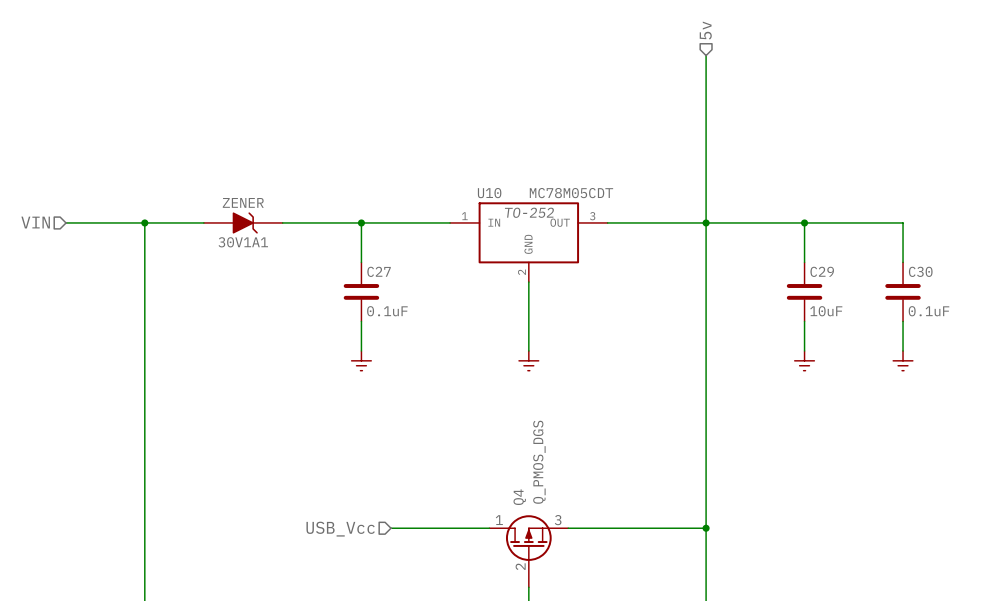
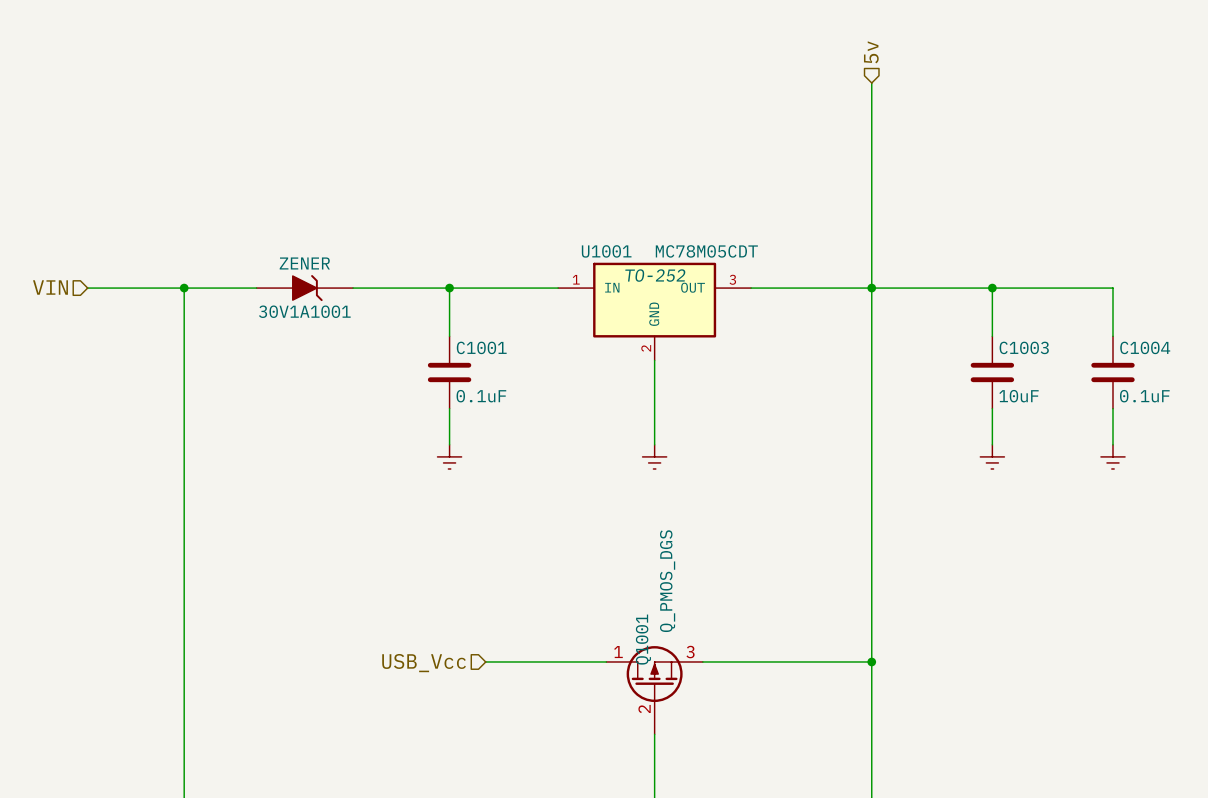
U10 name: U10 (489, 193) -> U1001 (606, 251)
30V1A1 name: 30V1A1 (243, 242) -> 30V1A1001 (304, 311)
C27 name: C27 (379, 271) -> C1001 (481, 347)
C29 name: C29 (822, 271) -> C1003 (1024, 347)
C30 name: C30 (920, 271) -> C1004 (1145, 347)
Q4 name: Q4 (519, 497) -> Q1001 (643, 639)

